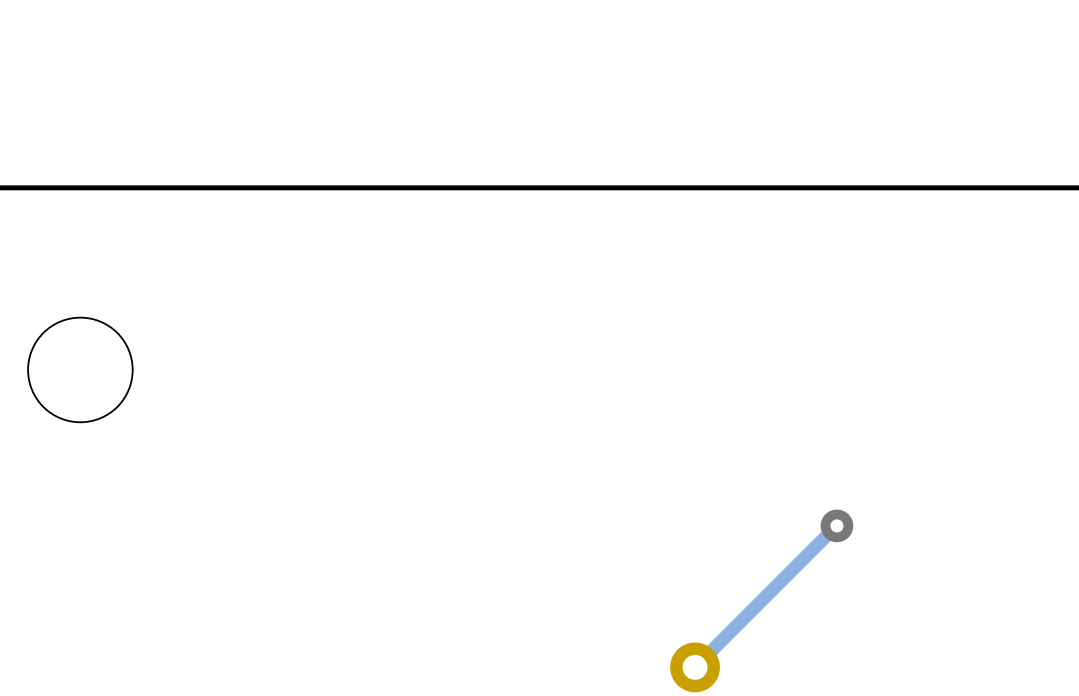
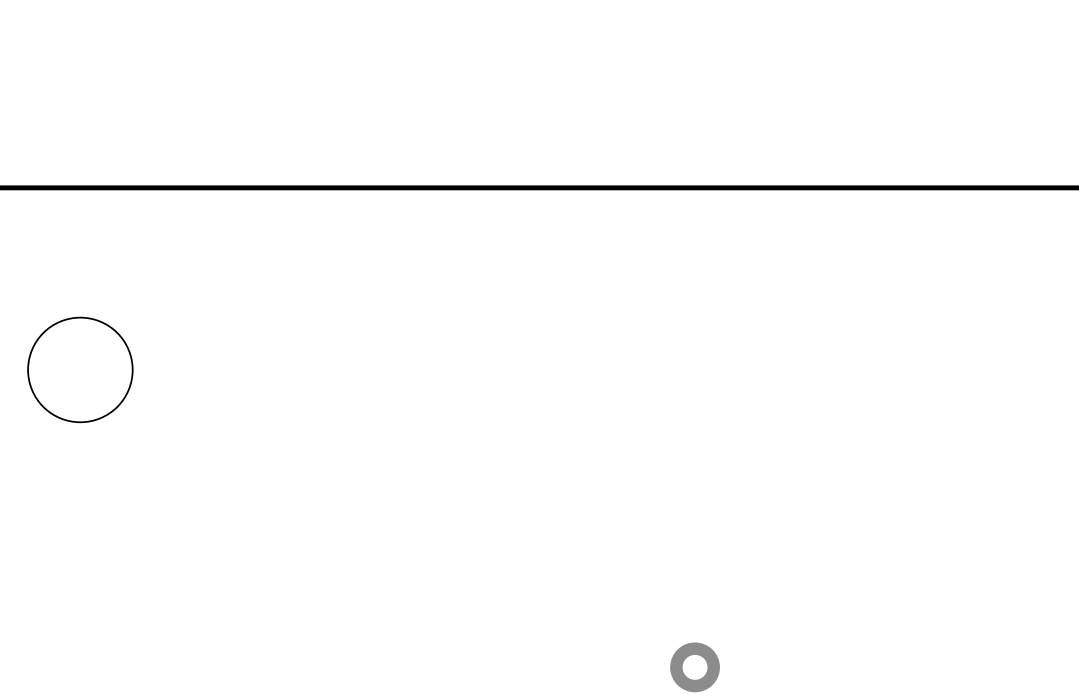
track: (836, 525) (695, 667) -> none
via: (836, 525) -> none

